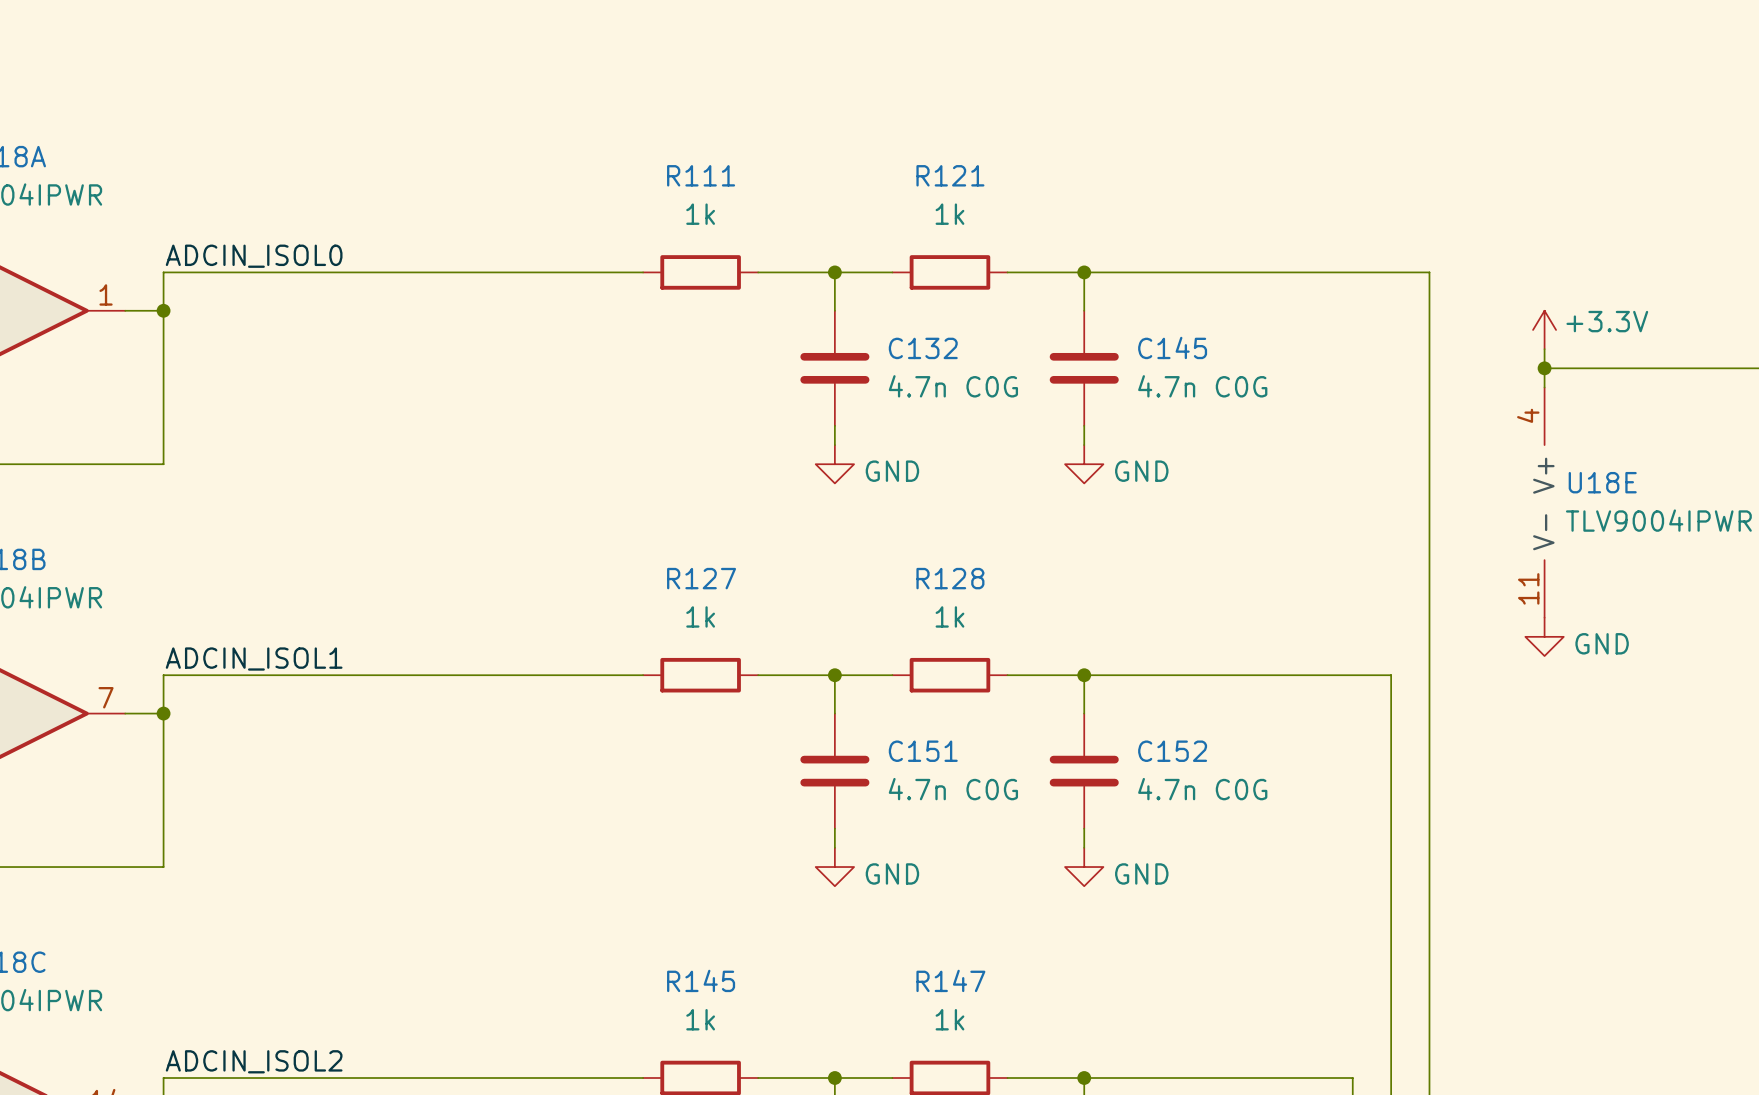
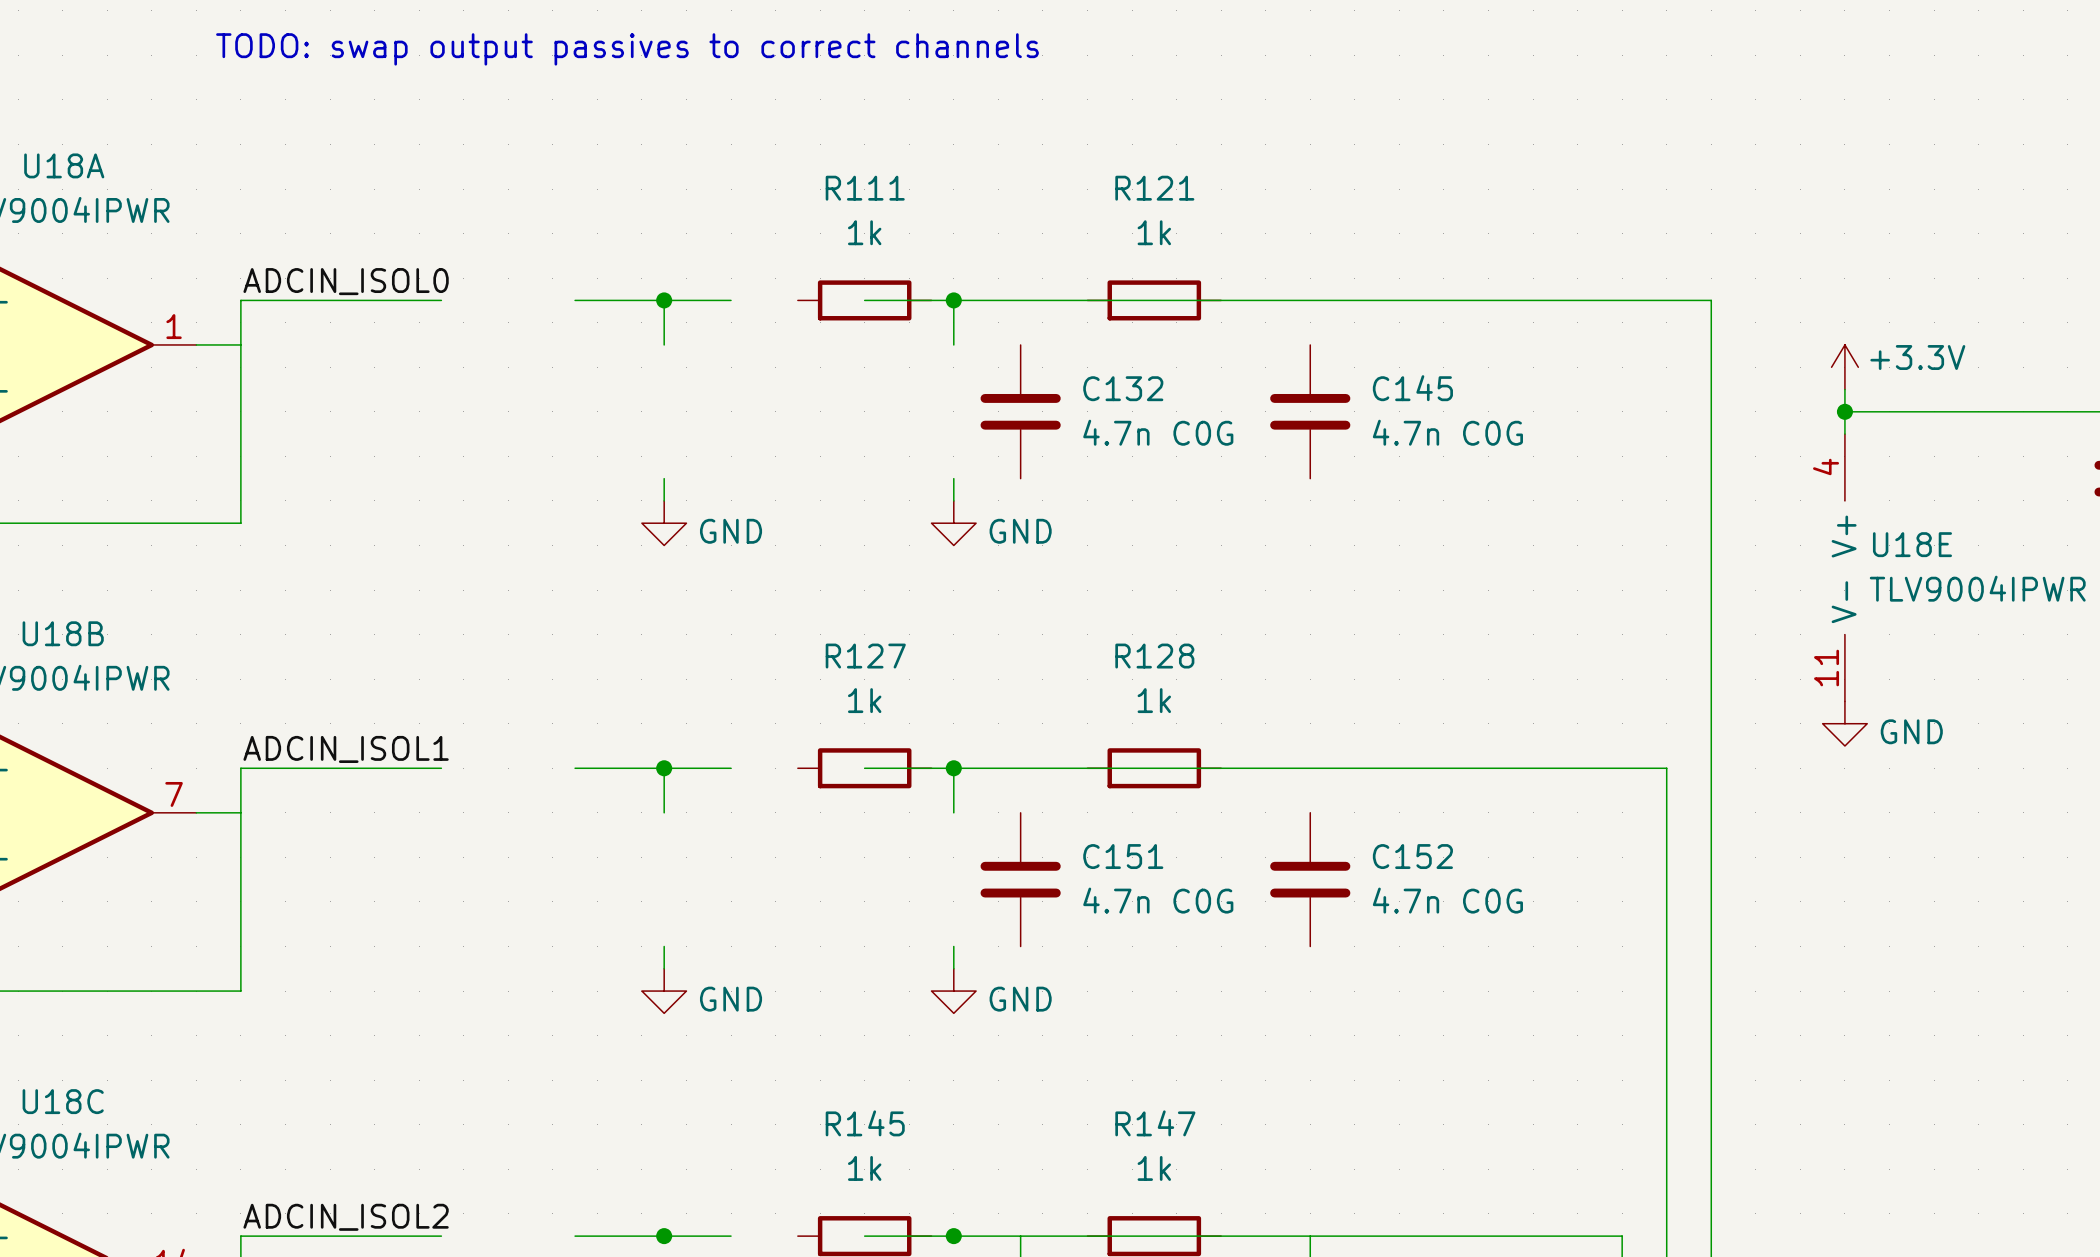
text: none -> TODO: swap output passives to correct channels (627, 49)
wire: (336, 272) (451, 272) -> none
junction: none -> (664, 300)
wire: (585, 272) (643, 272) -> (864, 300) (931, 300)
wire: (834, 272) (834, 310) -> (664, 300) (664, 344)
junction position: (834, 272) -> (953, 300)
wire: none -> (1087, 300) (1221, 300)
wire: (1084, 272) (1084, 310) -> (953, 300) (953, 344)
junction: (1084, 272) -> none
junction: (163, 310) -> none
wire: (834, 425) (834, 445) -> (664, 478) (664, 500)
wire: (1084, 425) (1084, 445) -> (953, 478) (953, 500)
power symbol: none -> GND (664, 523)
power symbol position: GND (834, 464) -> GND (953, 523)
power symbol: GND (1084, 464) -> none
wire: (336, 675) (451, 675) -> none
junction: none -> (664, 768)
wire: (585, 675) (643, 675) -> (864, 768) (931, 768)
wire: (834, 675) (834, 713) -> (664, 768) (664, 812)
junction position: (834, 675) -> (953, 768)
wire: none -> (1087, 768) (1221, 768)
wire: (1084, 675) (1084, 713) -> (953, 768) (953, 812)
junction: (1084, 675) -> none
junction: (163, 713) -> none
wire: (834, 828) (834, 847) -> (664, 946) (664, 968)
wire: (1084, 828) (1084, 847) -> (953, 946) (953, 968)
power symbol: none -> GND (664, 991)
power symbol position: GND (834, 867) -> GND (953, 991)
power symbol: GND (1084, 867) -> none
wire: (336, 1078) (451, 1078) -> none
junction: none -> (664, 1236)
wire: (585, 1078) (643, 1078) -> (864, 1236) (931, 1236)
junction position: (834, 1078) -> (953, 1236)
wire: none -> (1087, 1236) (1221, 1236)
junction: (1084, 1078) -> none

